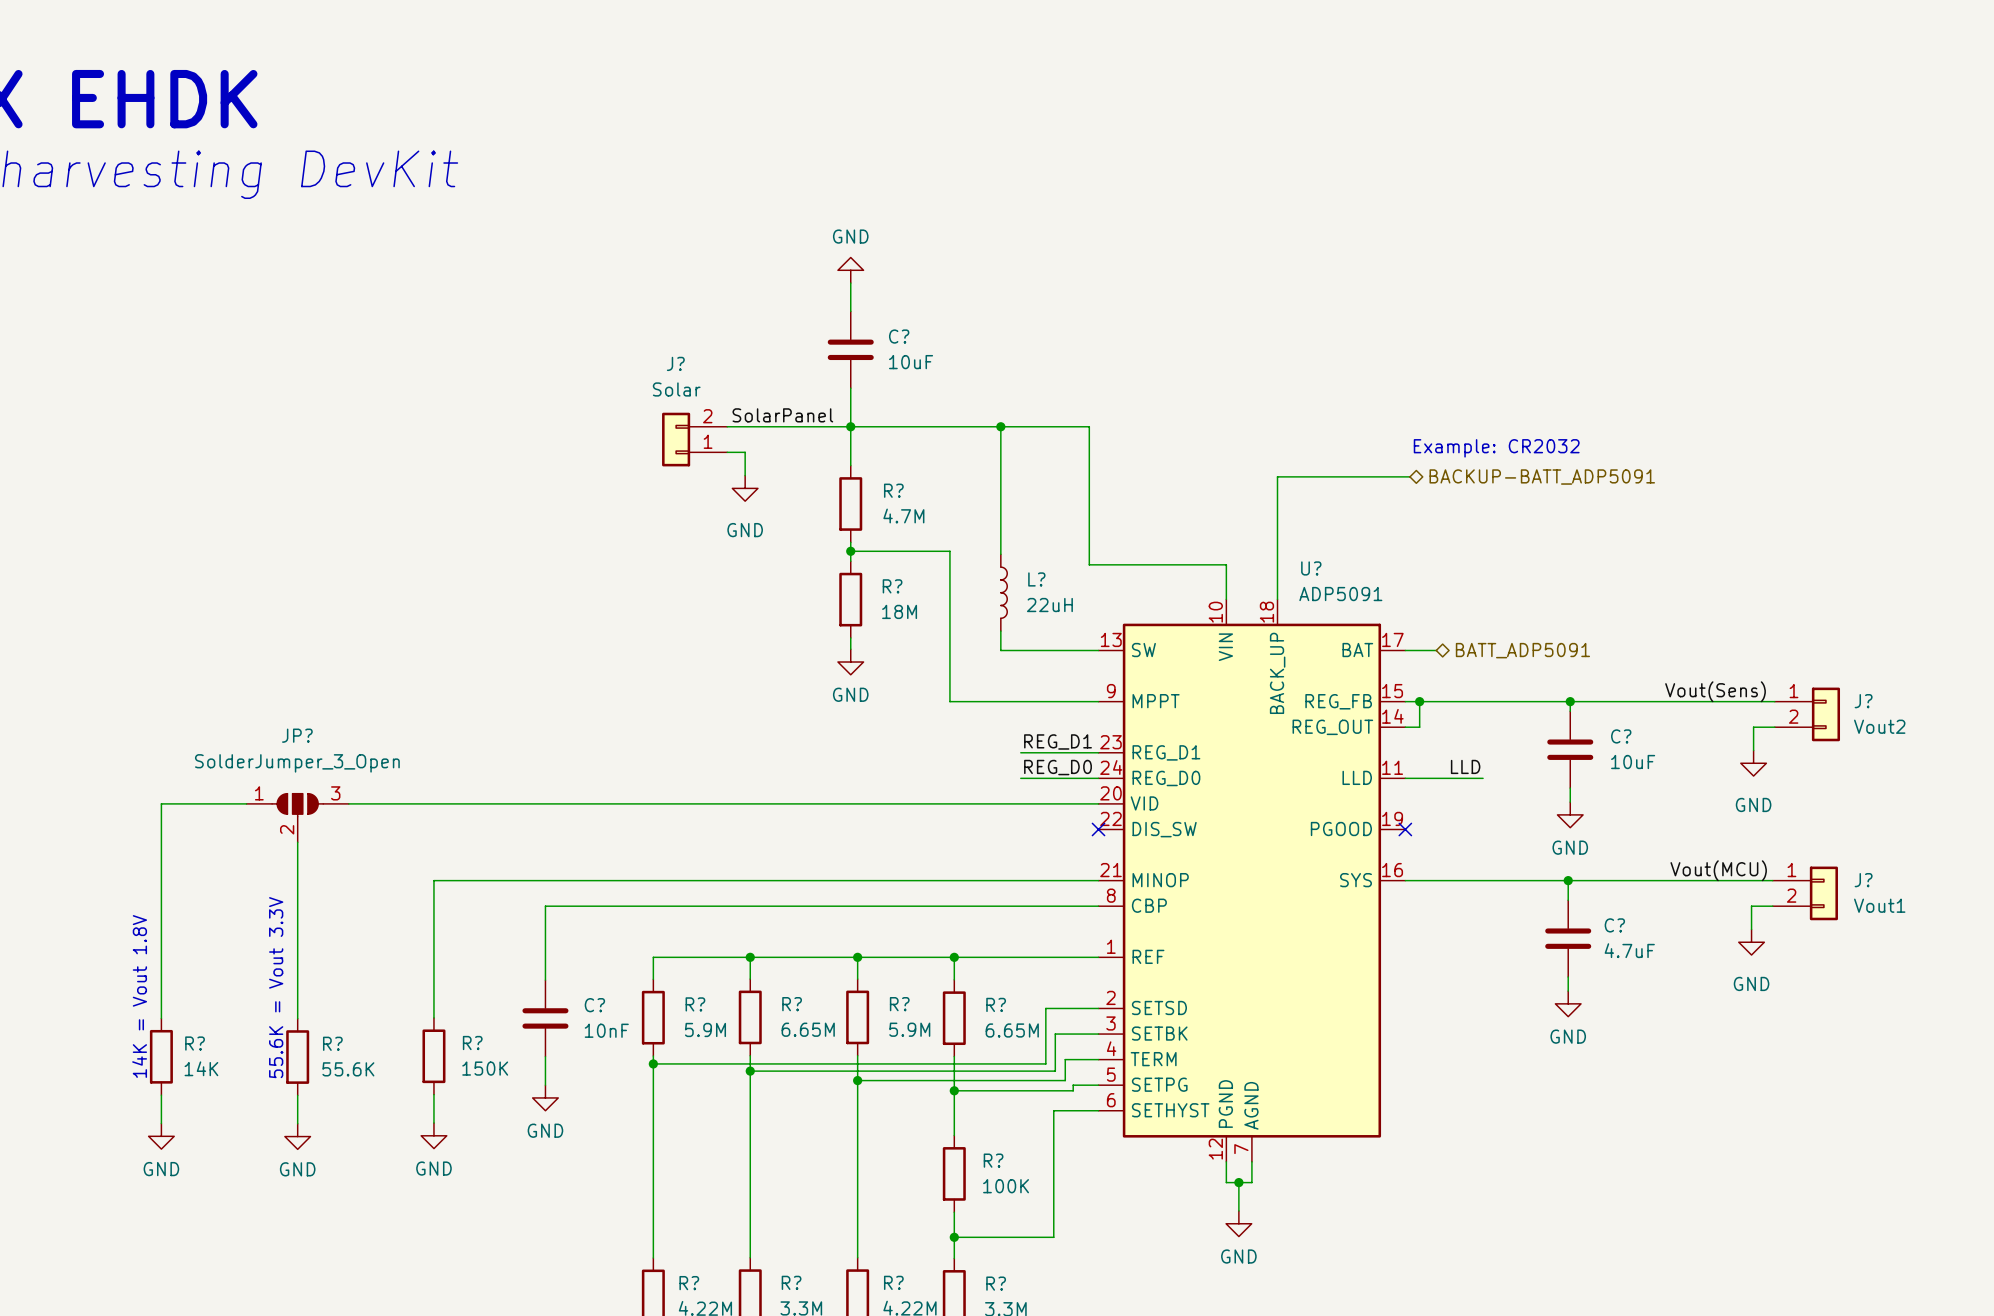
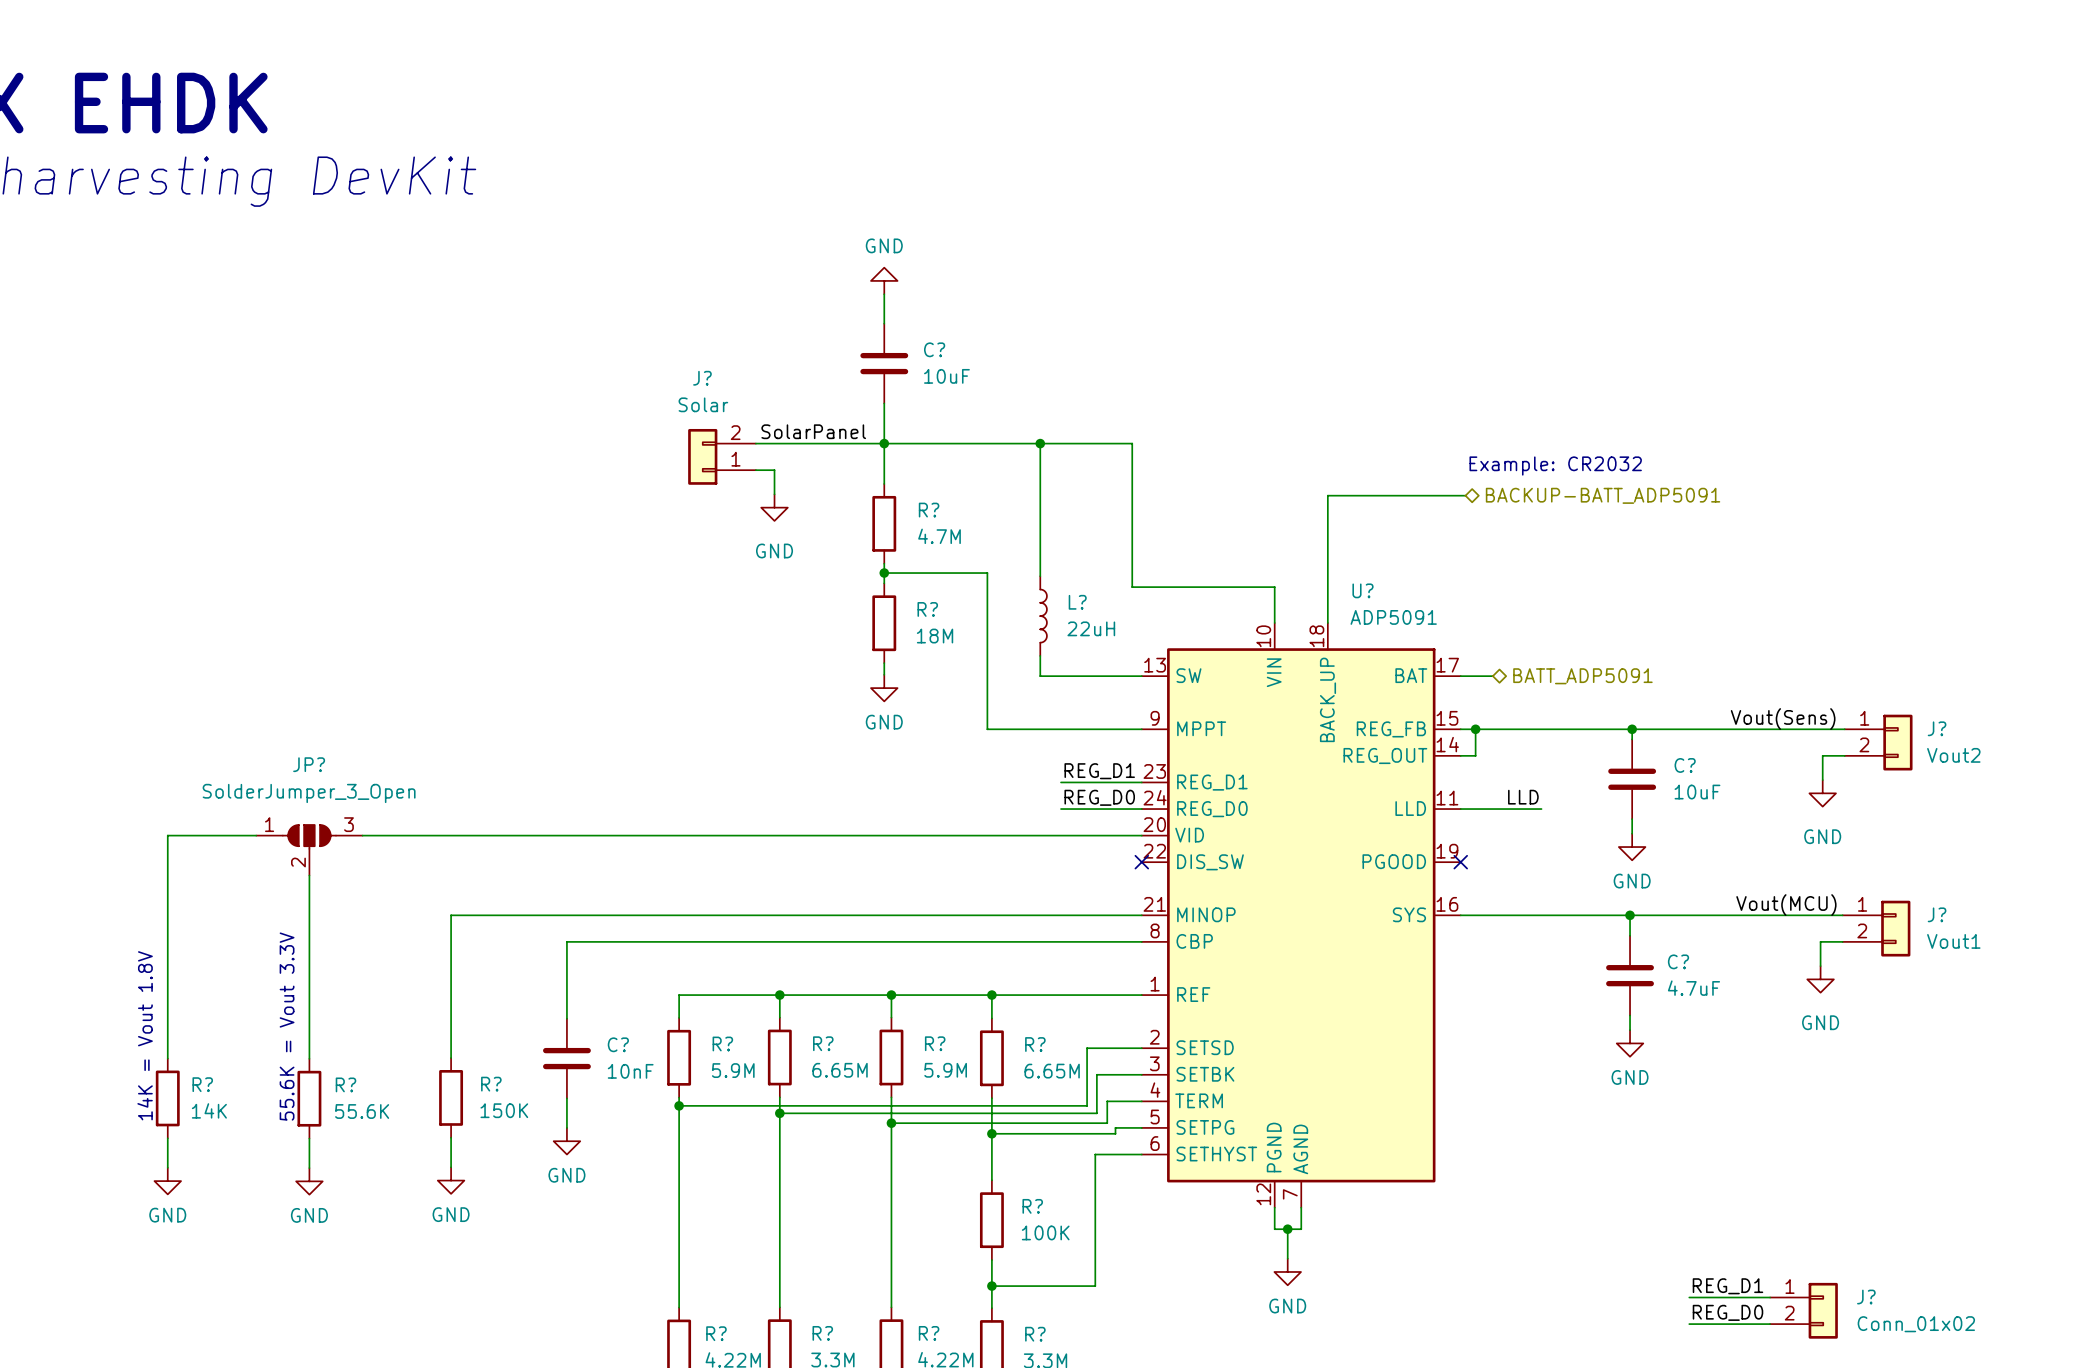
label: none -> REG_D1 (1727, 1286)
wire: none -> (1689, 1297) (1770, 1297)
J?: none -> Conn_01x02 (1803, 1310)
label: none -> REG_D0 (1727, 1312)
wire: none -> (1689, 1324) (1770, 1324)

